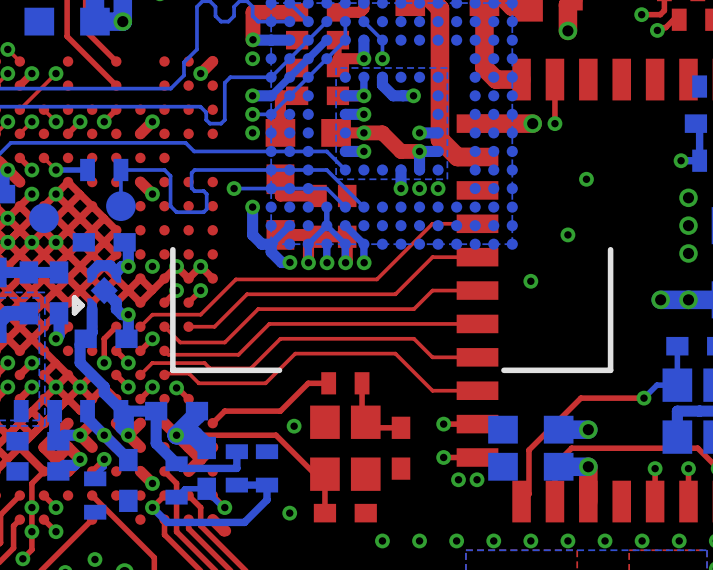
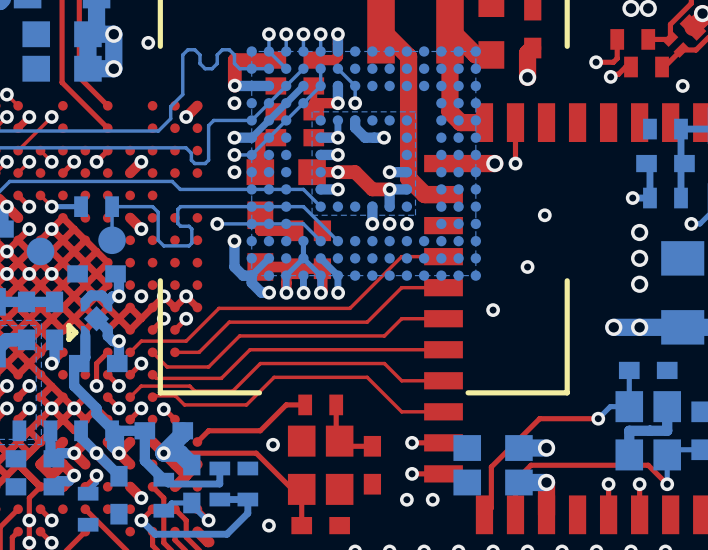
via: (458, 479) -> none
via: (477, 479) -> none
via: none -> (406, 499)
via: none -> (432, 499)

